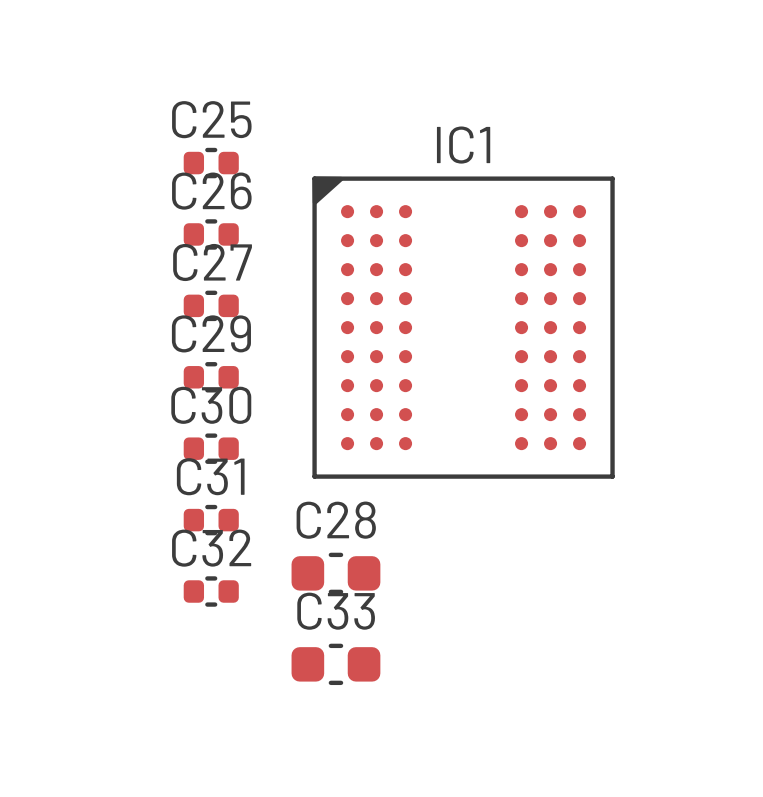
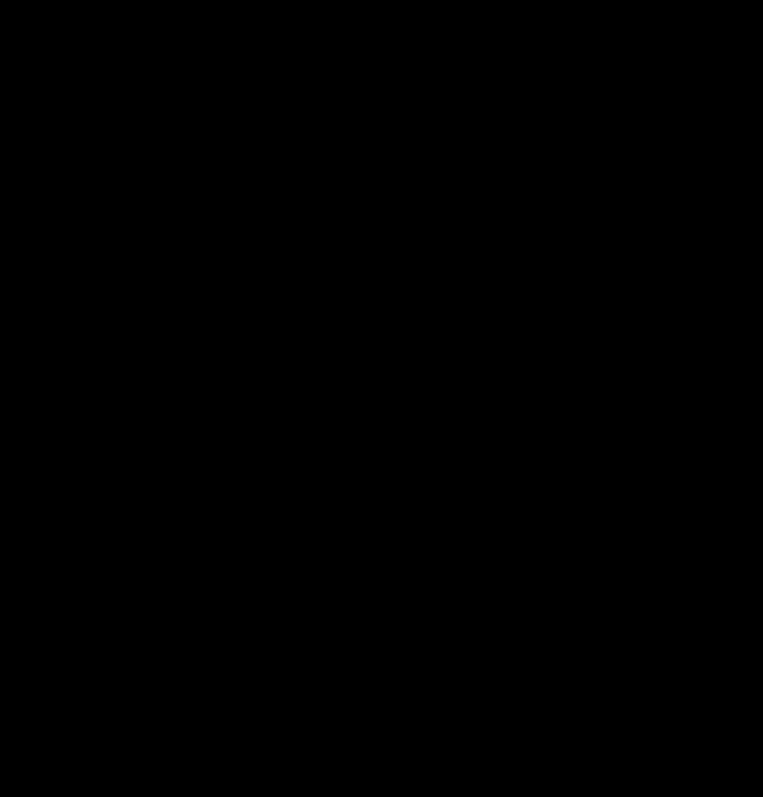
C25: (211, 163) -> none
C26: (211, 234) -> none
C27: (211, 305) -> none
IC1: (463, 327) -> none
C29: (211, 377) -> none
C30: (211, 448) -> none
C31: (211, 520) -> none
C28: (335, 573) -> none
C32: (211, 591) -> none
C33: (335, 664) -> none

